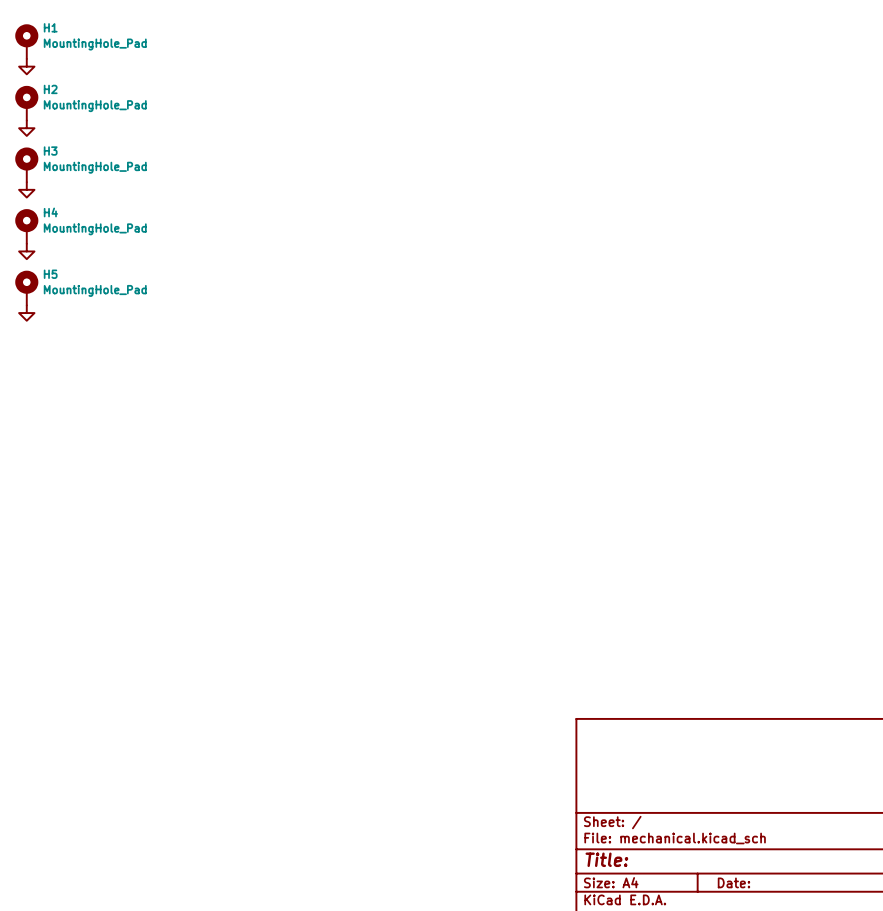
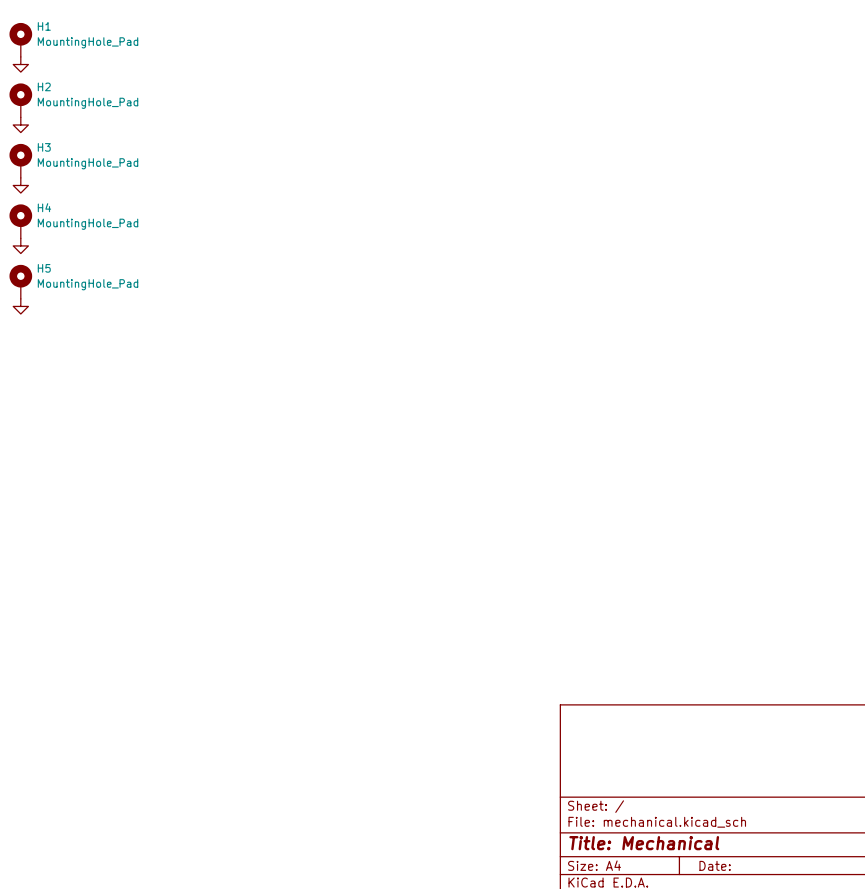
title block: Title: (606, 859) -> Title: Mechanical (644, 843)

